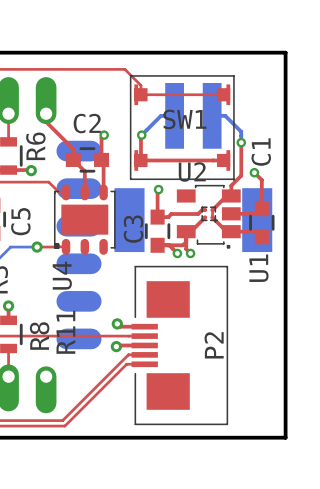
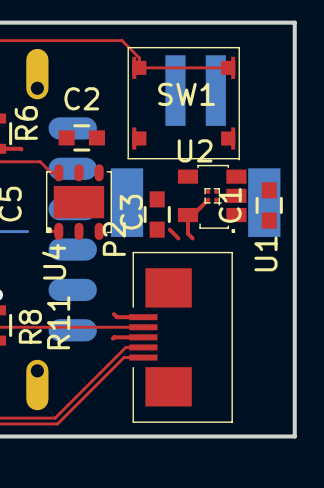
top track: (46, 113) (46, 121) (73, 149) (73, 159) (84, 171) (84, 192) -> none
bottom track: (174, 115) (160, 115) (141, 135) -> none
bottom track: (212, 115) (225, 115) (241, 131) (241, 142) -> none
top track: (104, 135) (101, 137) (103, 192) -> none
via: (104, 135) -> none
top track: (141, 135) (140, 160) (223, 160) -> none
via: (141, 135) -> none
top track: (241, 142) (241, 175) (231, 185) (231, 195) (226, 195) (212, 210) (212, 217) (226, 231) (256, 231) (261, 236) -> none
via: (241, 142) -> none
C1 name position: C1 (261, 152) -> C1 (230, 205)
via: (31, 170) -> none
top track: (254, 172) (261, 180) (261, 208) (256, 213) (231, 213) -> none
via: (254, 172) -> none
top track: (158, 189) (157, 217) (168, 217) (171, 214) (198, 214) (205, 210) -> none
via: (158, 189) -> none
top track: (186, 241) (182, 245) (157, 245) -> none
top track: (37, 247) (58, 247) -> none
via: (37, 247) -> none
via: (177, 253) -> none
via: (190, 253) -> none
via: (117, 323) -> none
P2 name position: P2 (214, 345) -> P2 (114, 238)
via: (116, 346) -> none

